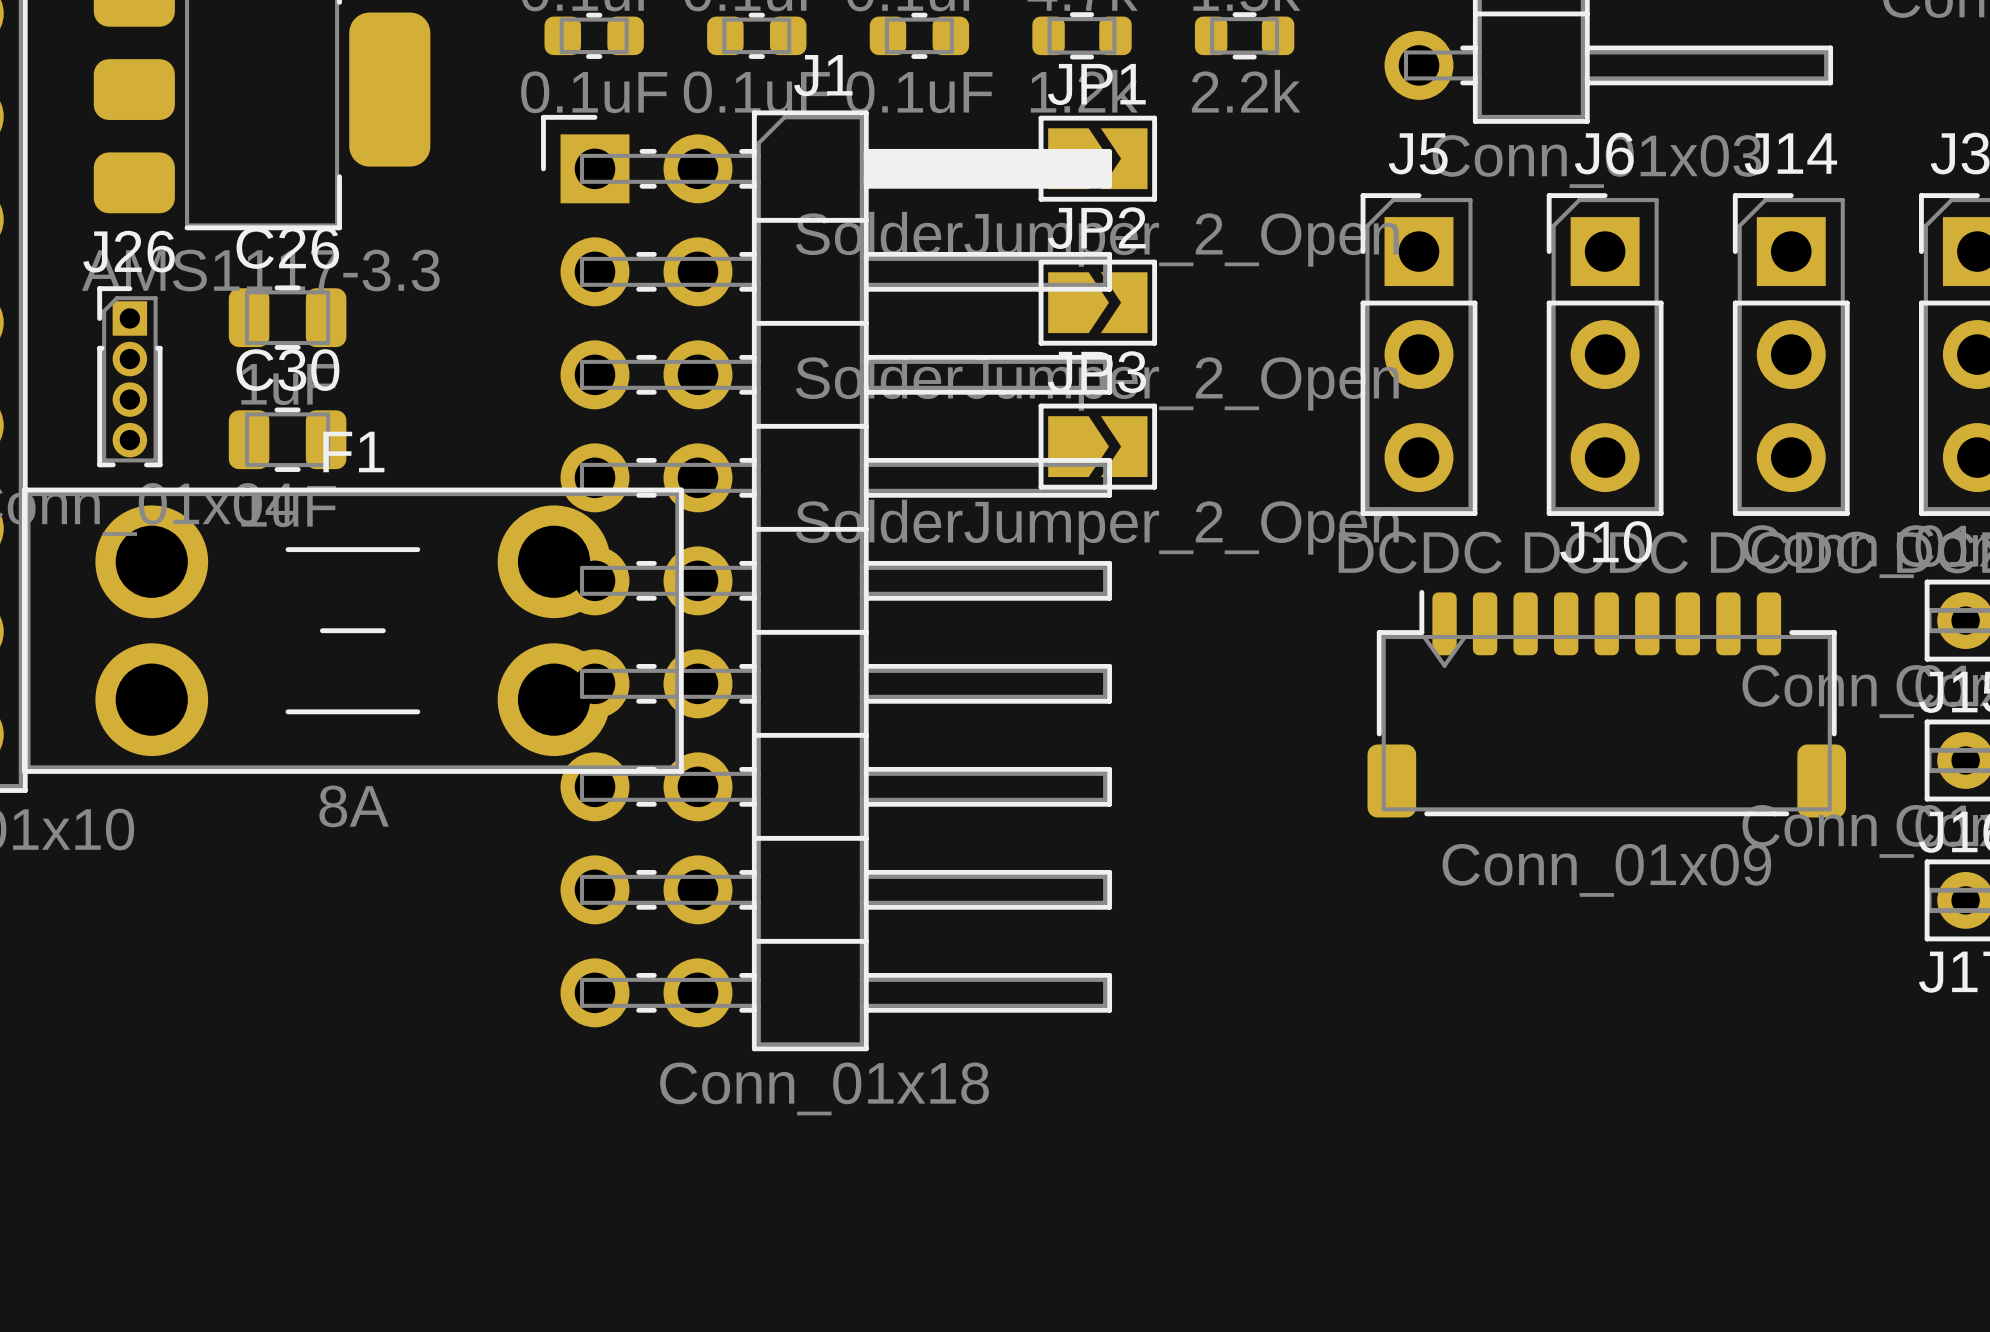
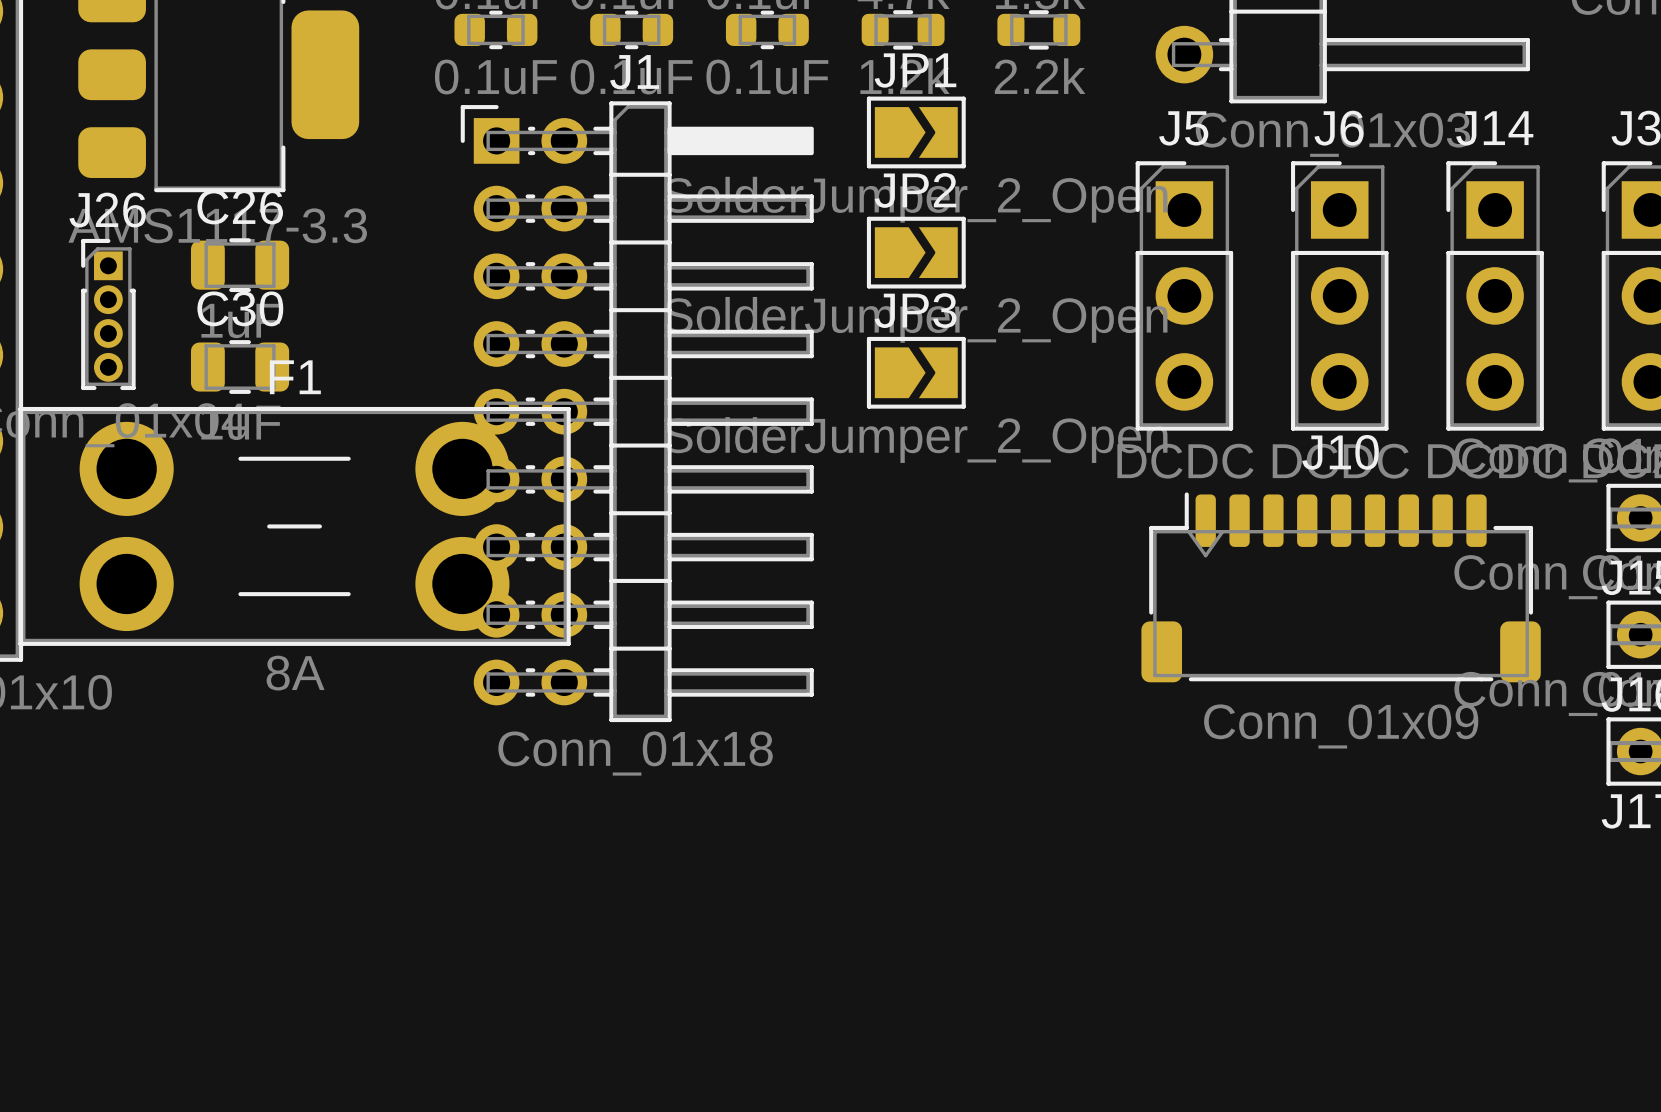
J1 name position: J1 (823, 75) -> J1 (634, 72)
J1 footprint: [541, 110, 1113, 1052] -> [460, 101, 814, 723]
J1 value position: Conn_01x18 (824, 1088) -> Conn_01x18 (635, 753)

